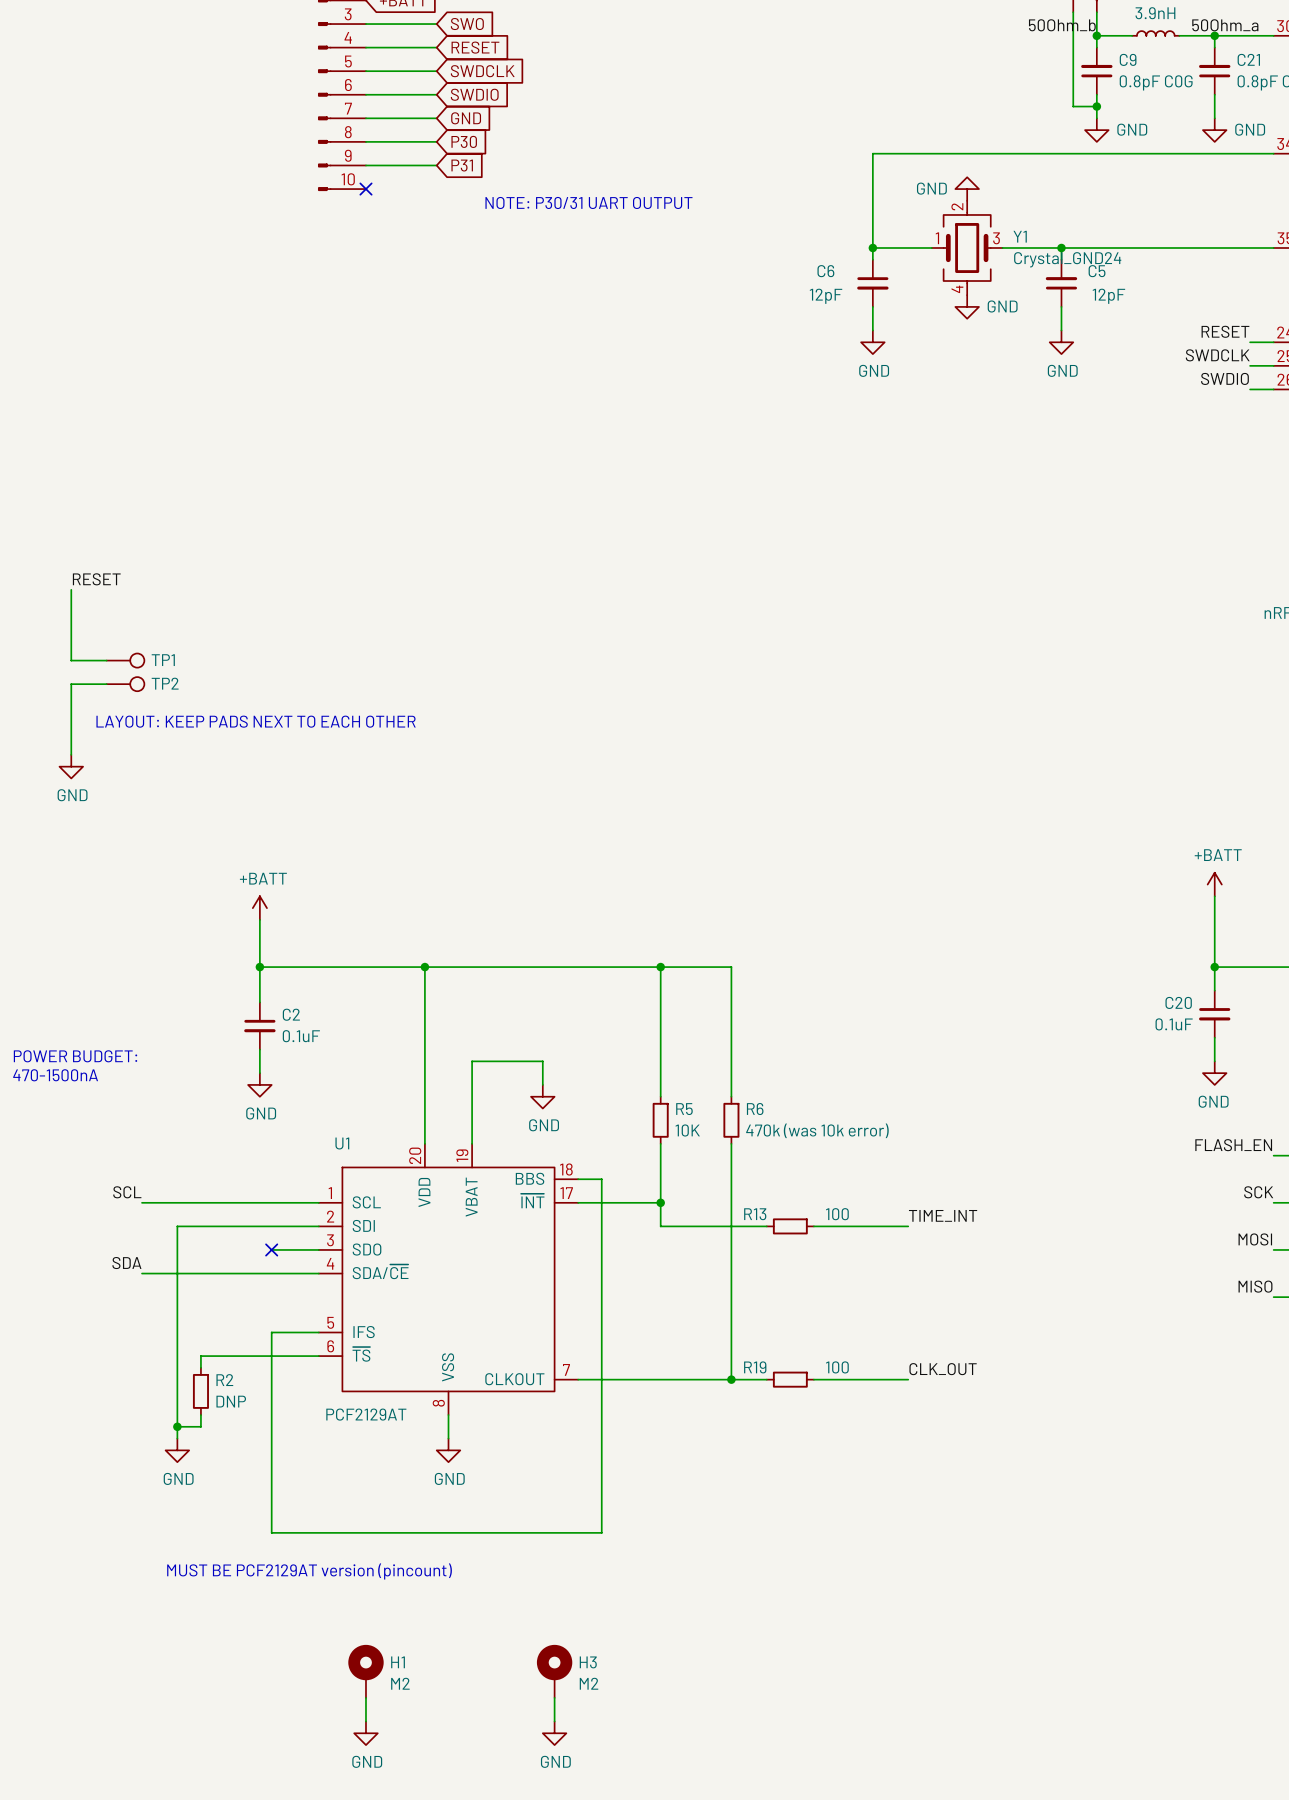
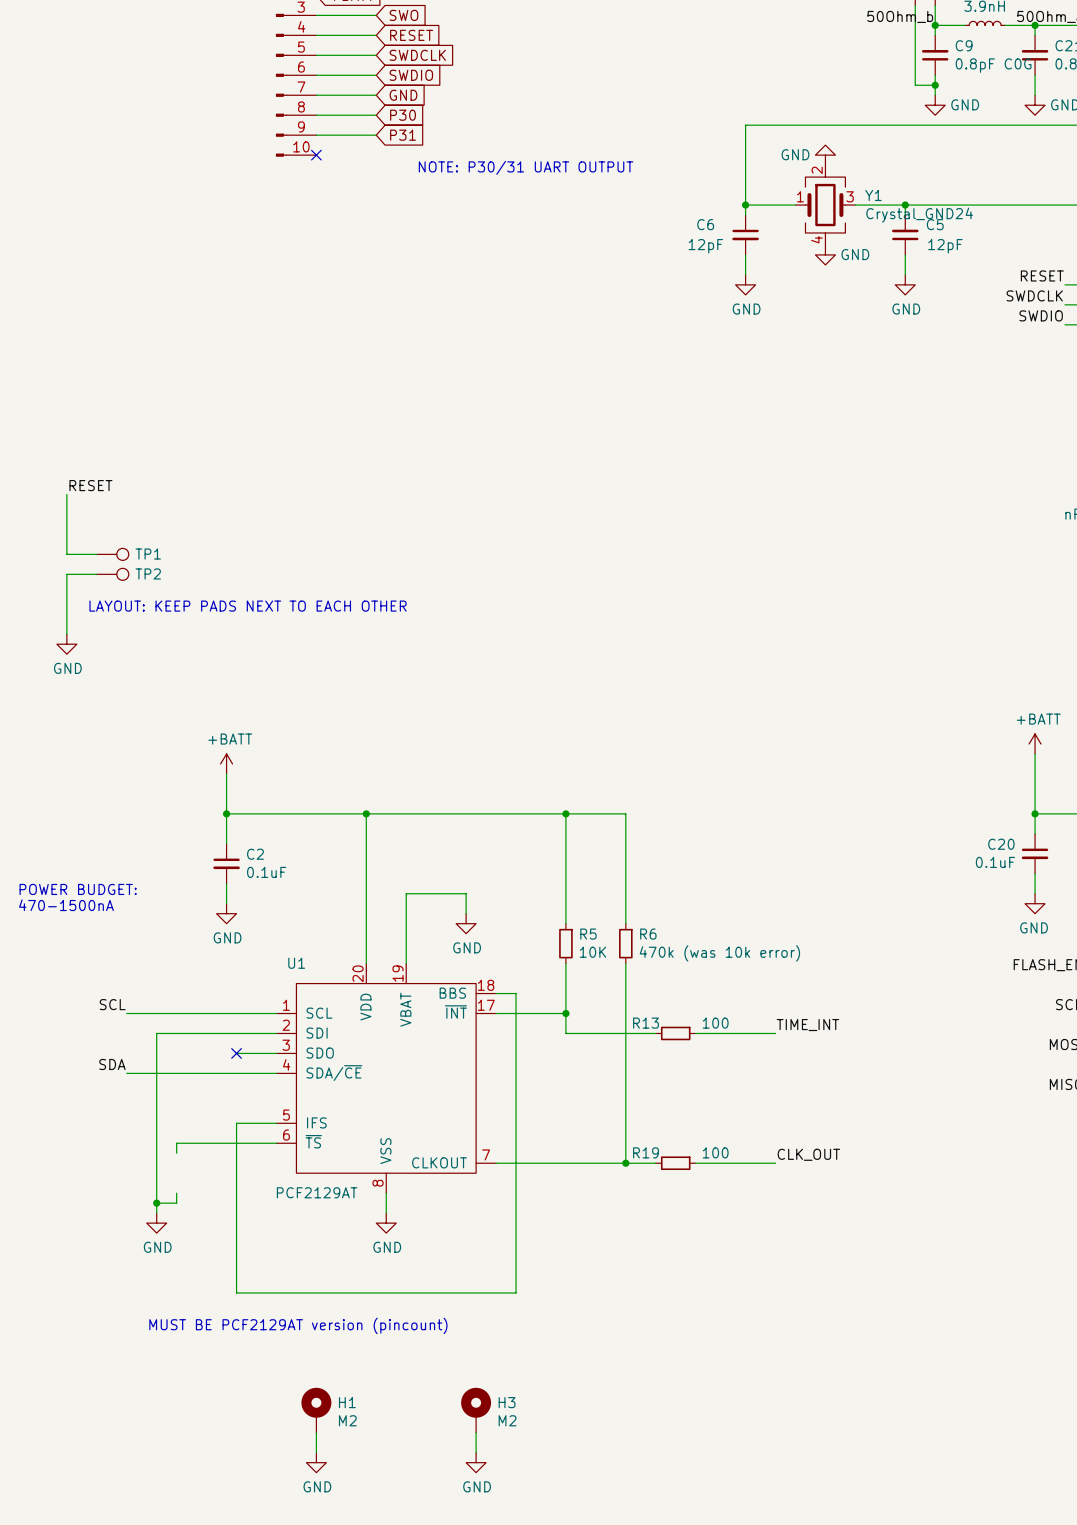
R2: DNP (200, 1391) -> none

